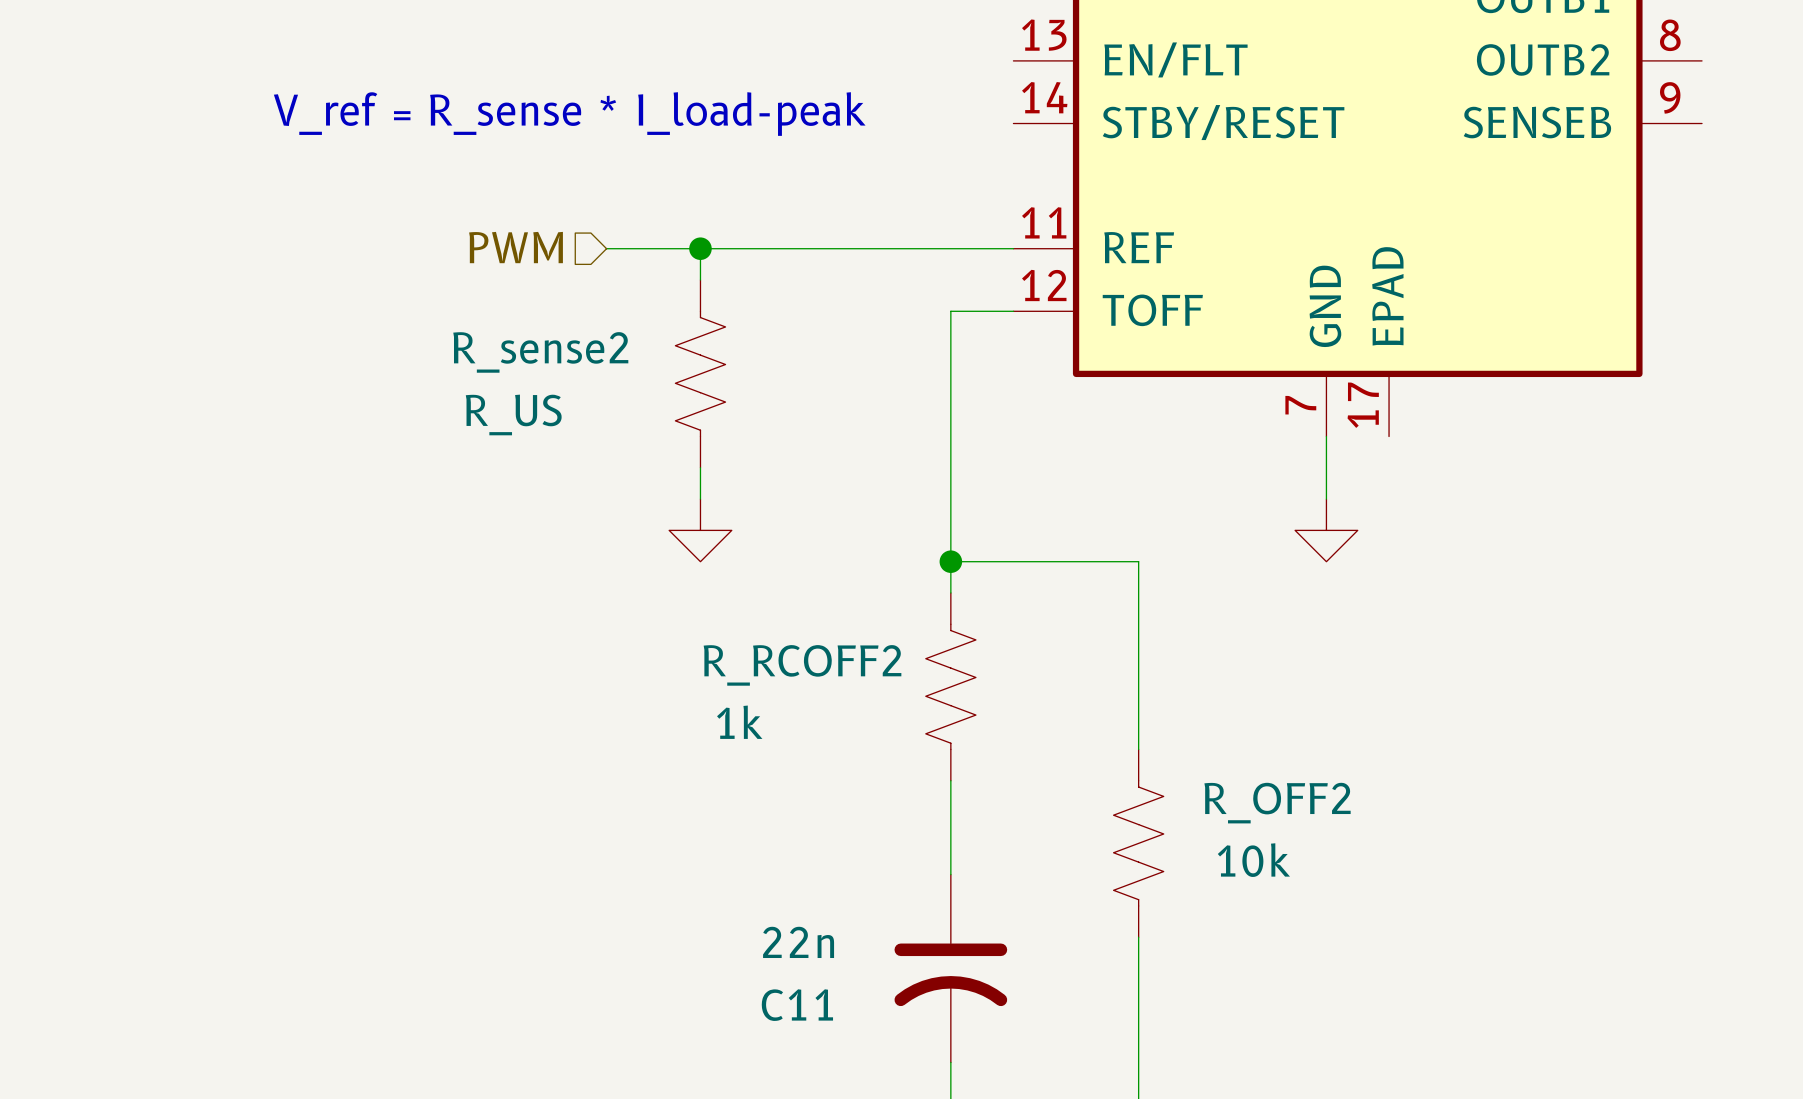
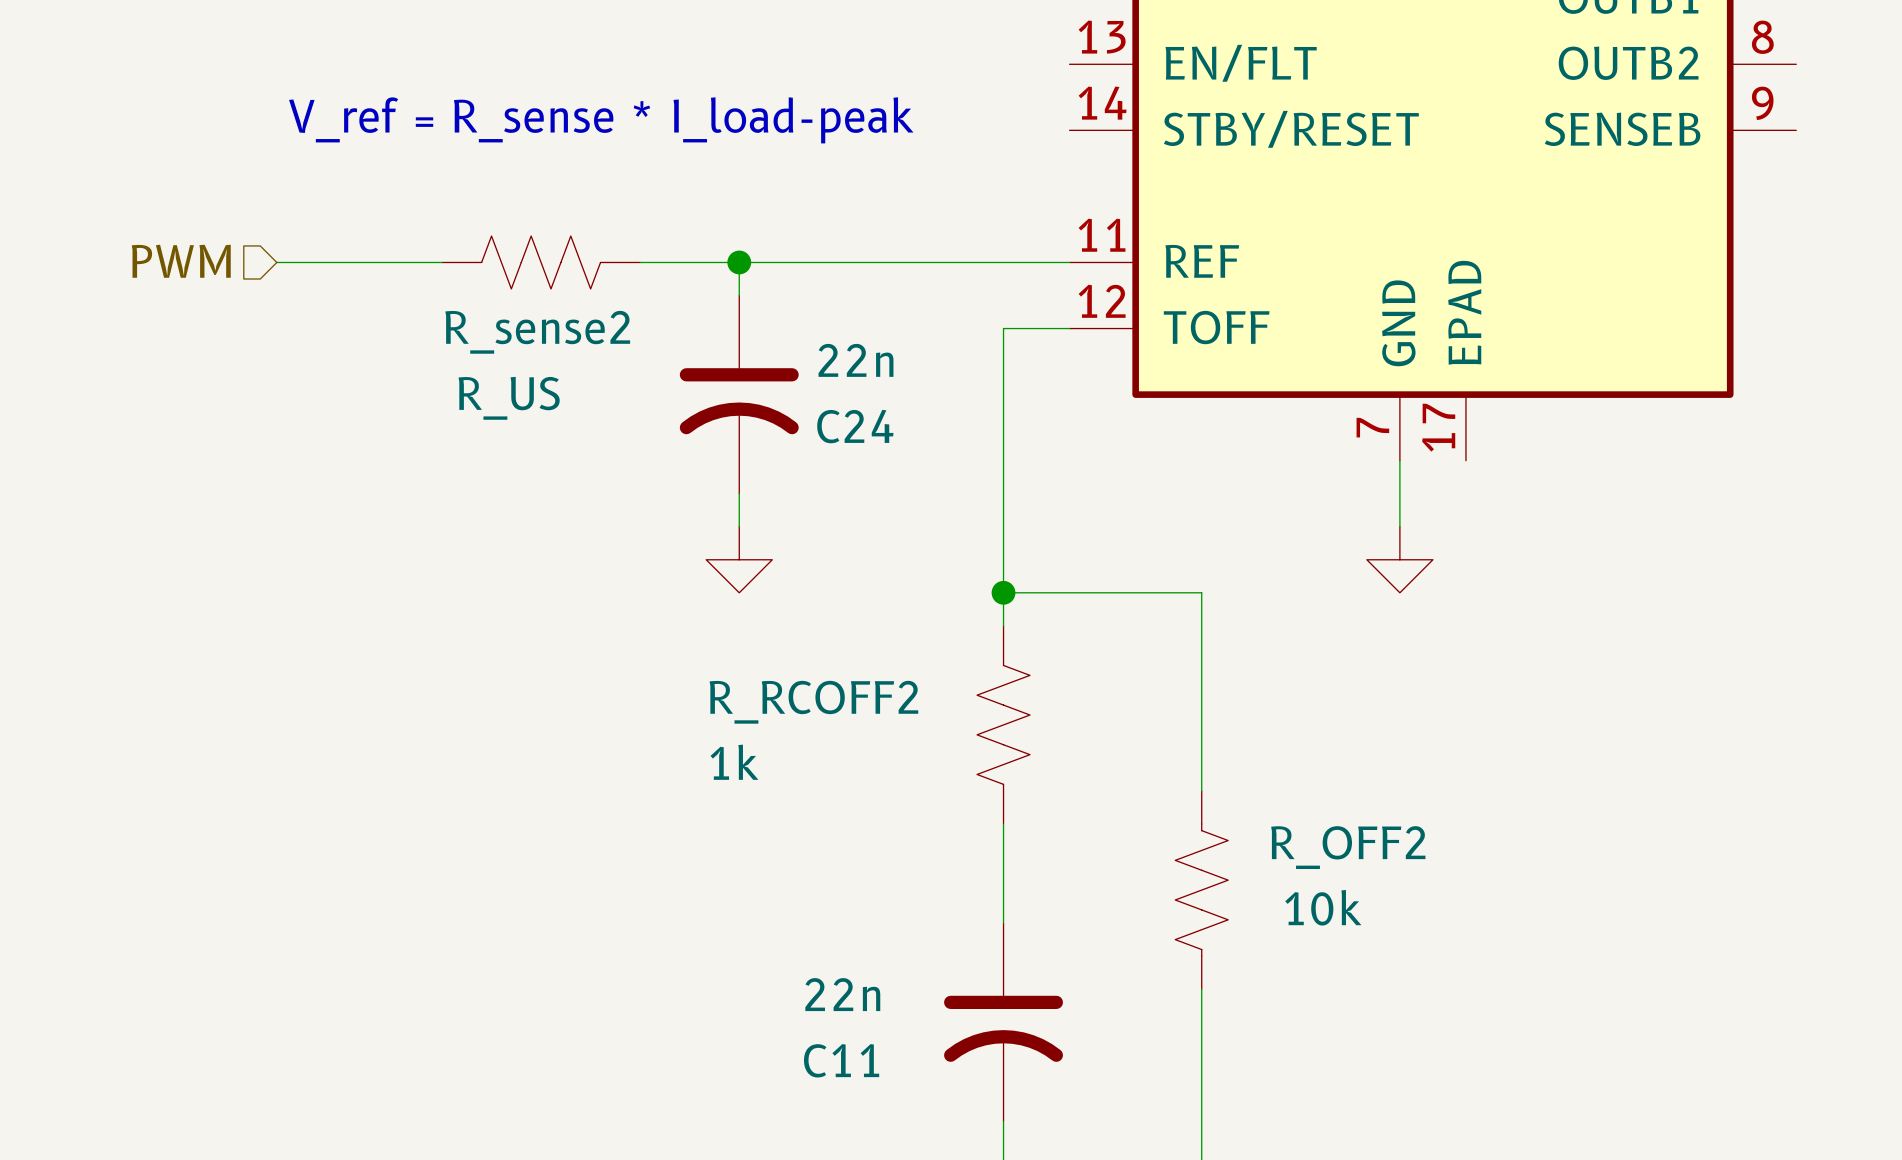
hierarchical label position: PWM (516, 247) -> PWM (181, 261)
wire: none -> (276, 262) (441, 262)
R_sense2 name position: R_sense2 (540, 352) -> R_sense2 (537, 332)
R_sense2 rotation: 0° (700, 373) -> 90° clockwise (541, 262)
R_sense2 position: (700, 373) -> (541, 262)
C24: none -> 22n (739, 394)
R_sense2 value position: R_US (513, 414) -> R_US (509, 398)
R_RCOFF2 name position: R_RCOFF2 (802, 665) -> R_RCOFF2 (813, 702)
R_RCOFF2 value position: 1k (739, 722) -> 1k (734, 762)

